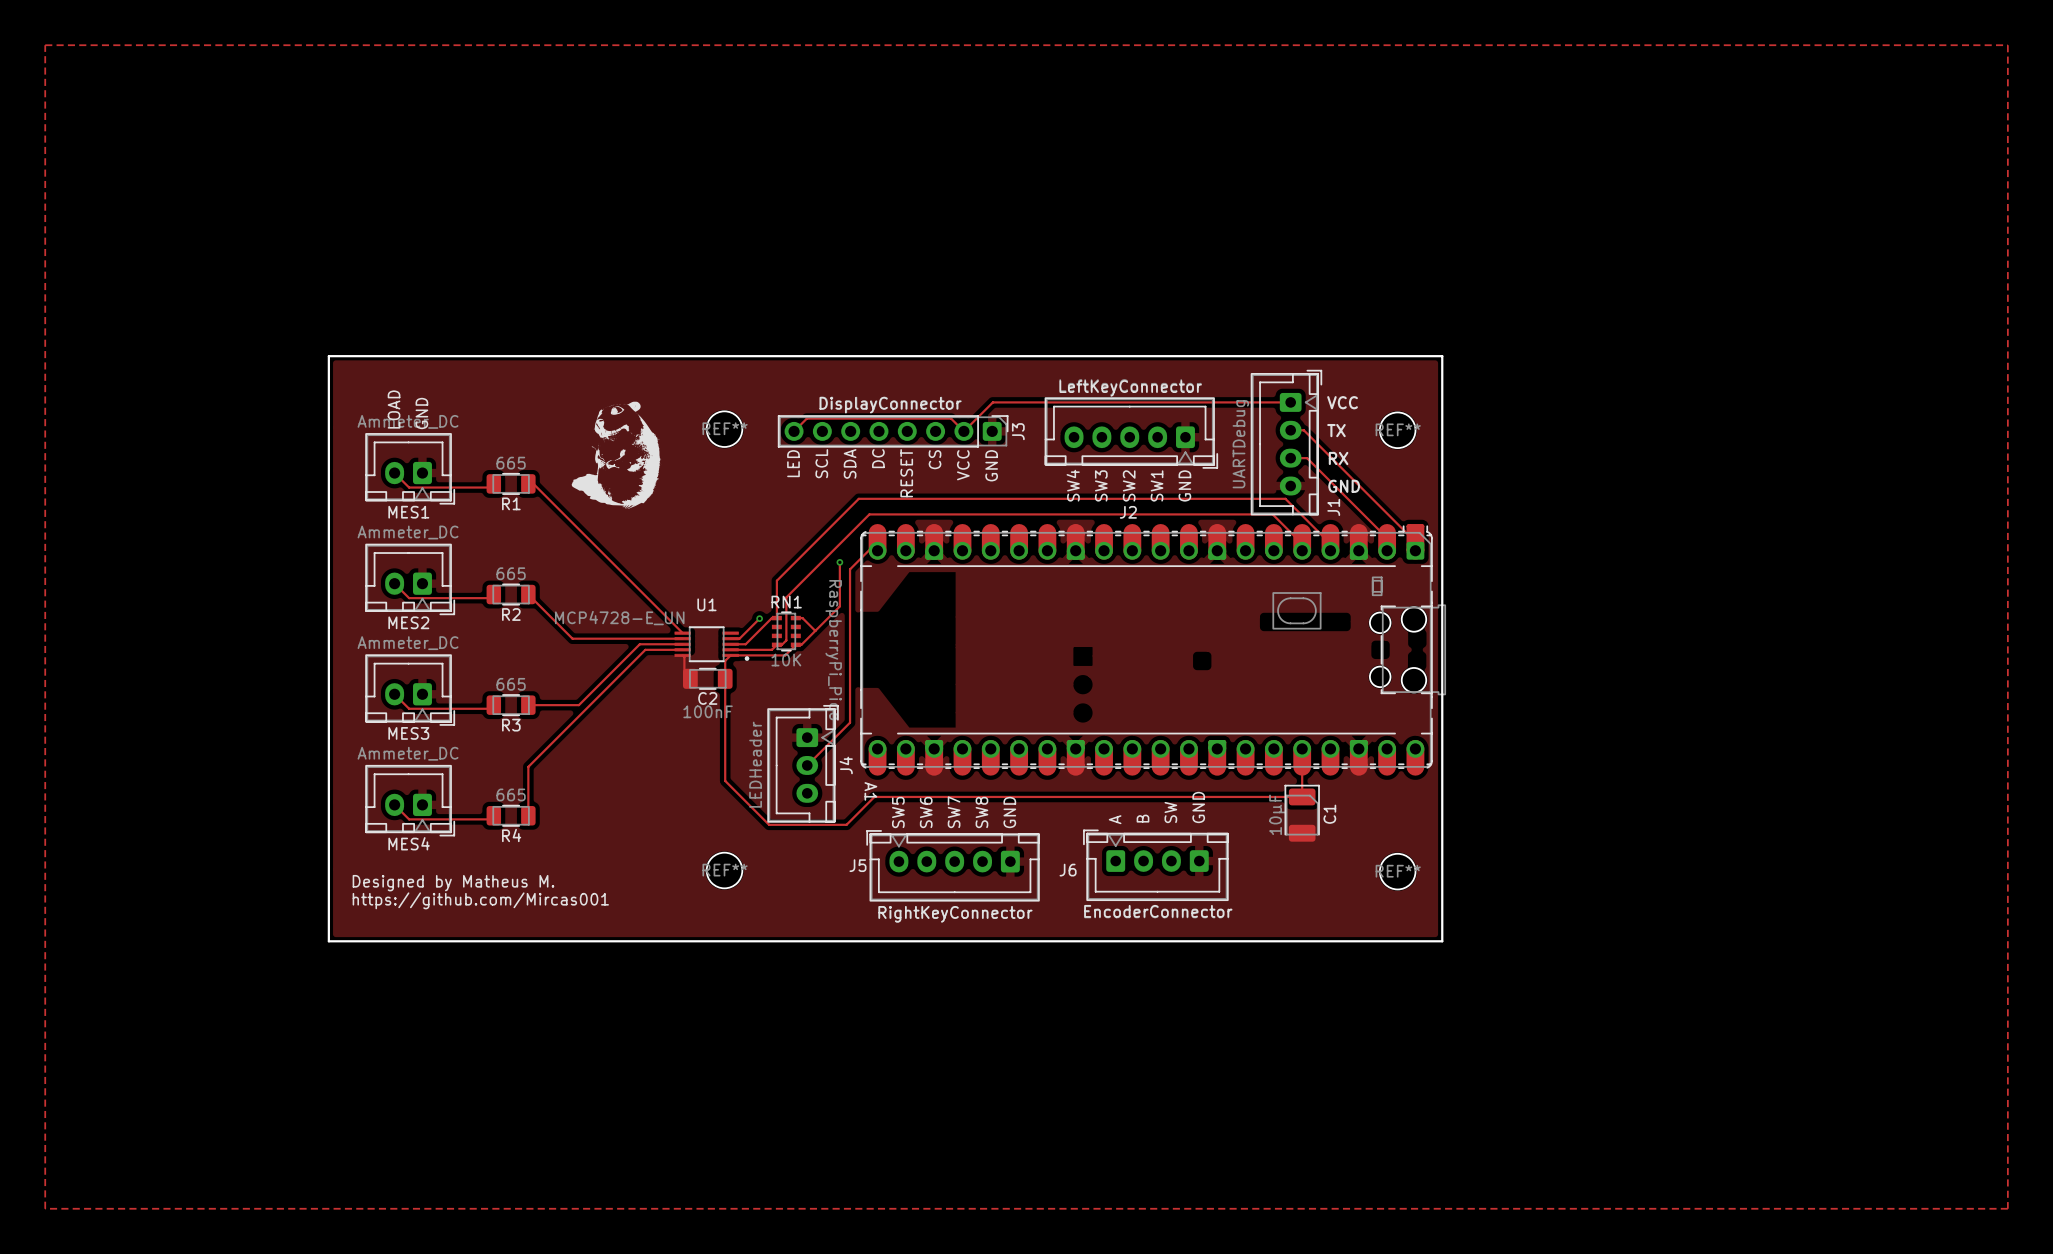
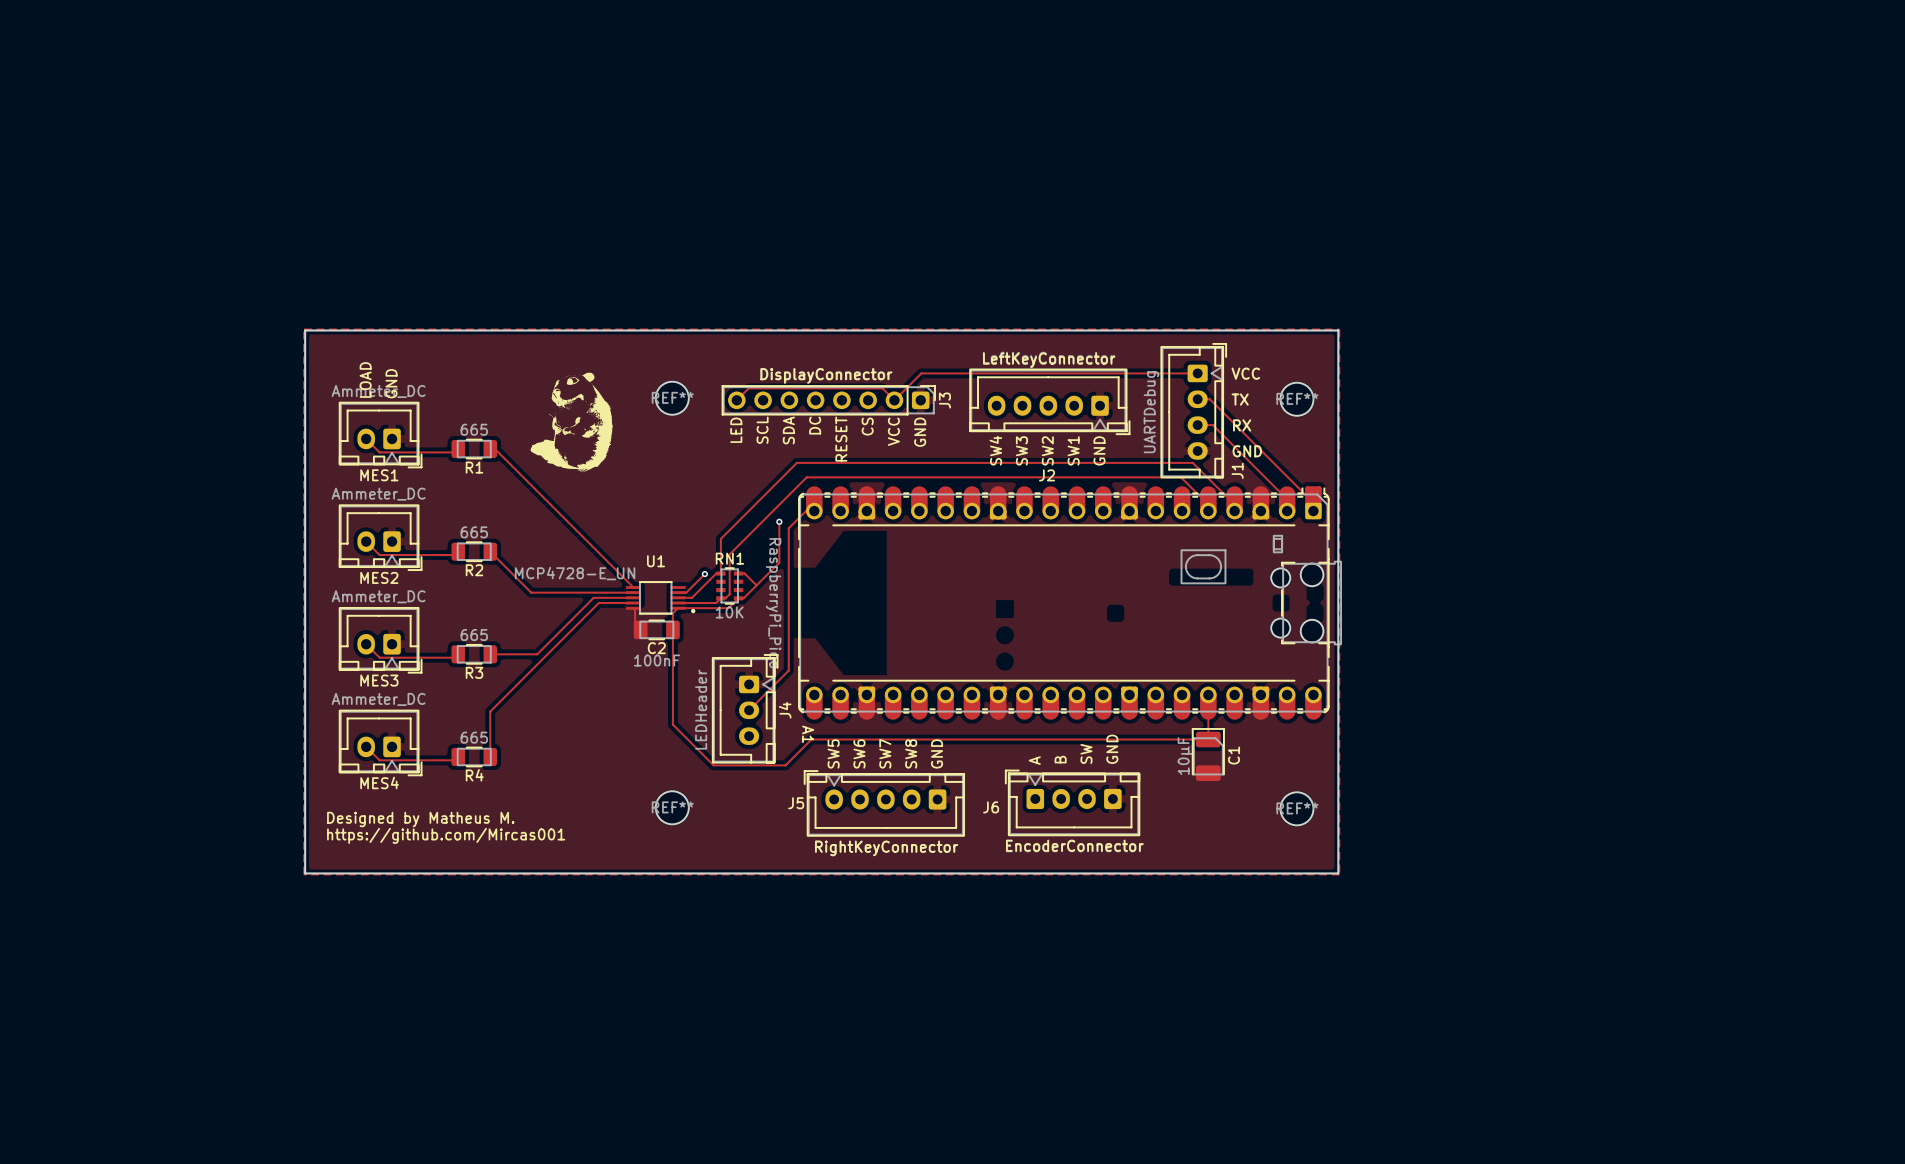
zone outline: (45, 45) (2007, 45) (2007, 1208) (45, 1208) (45, 45) -> none
zone outline: none -> (304, 329) (1339, 329) (1339, 874) (304, 874) (304, 329)

